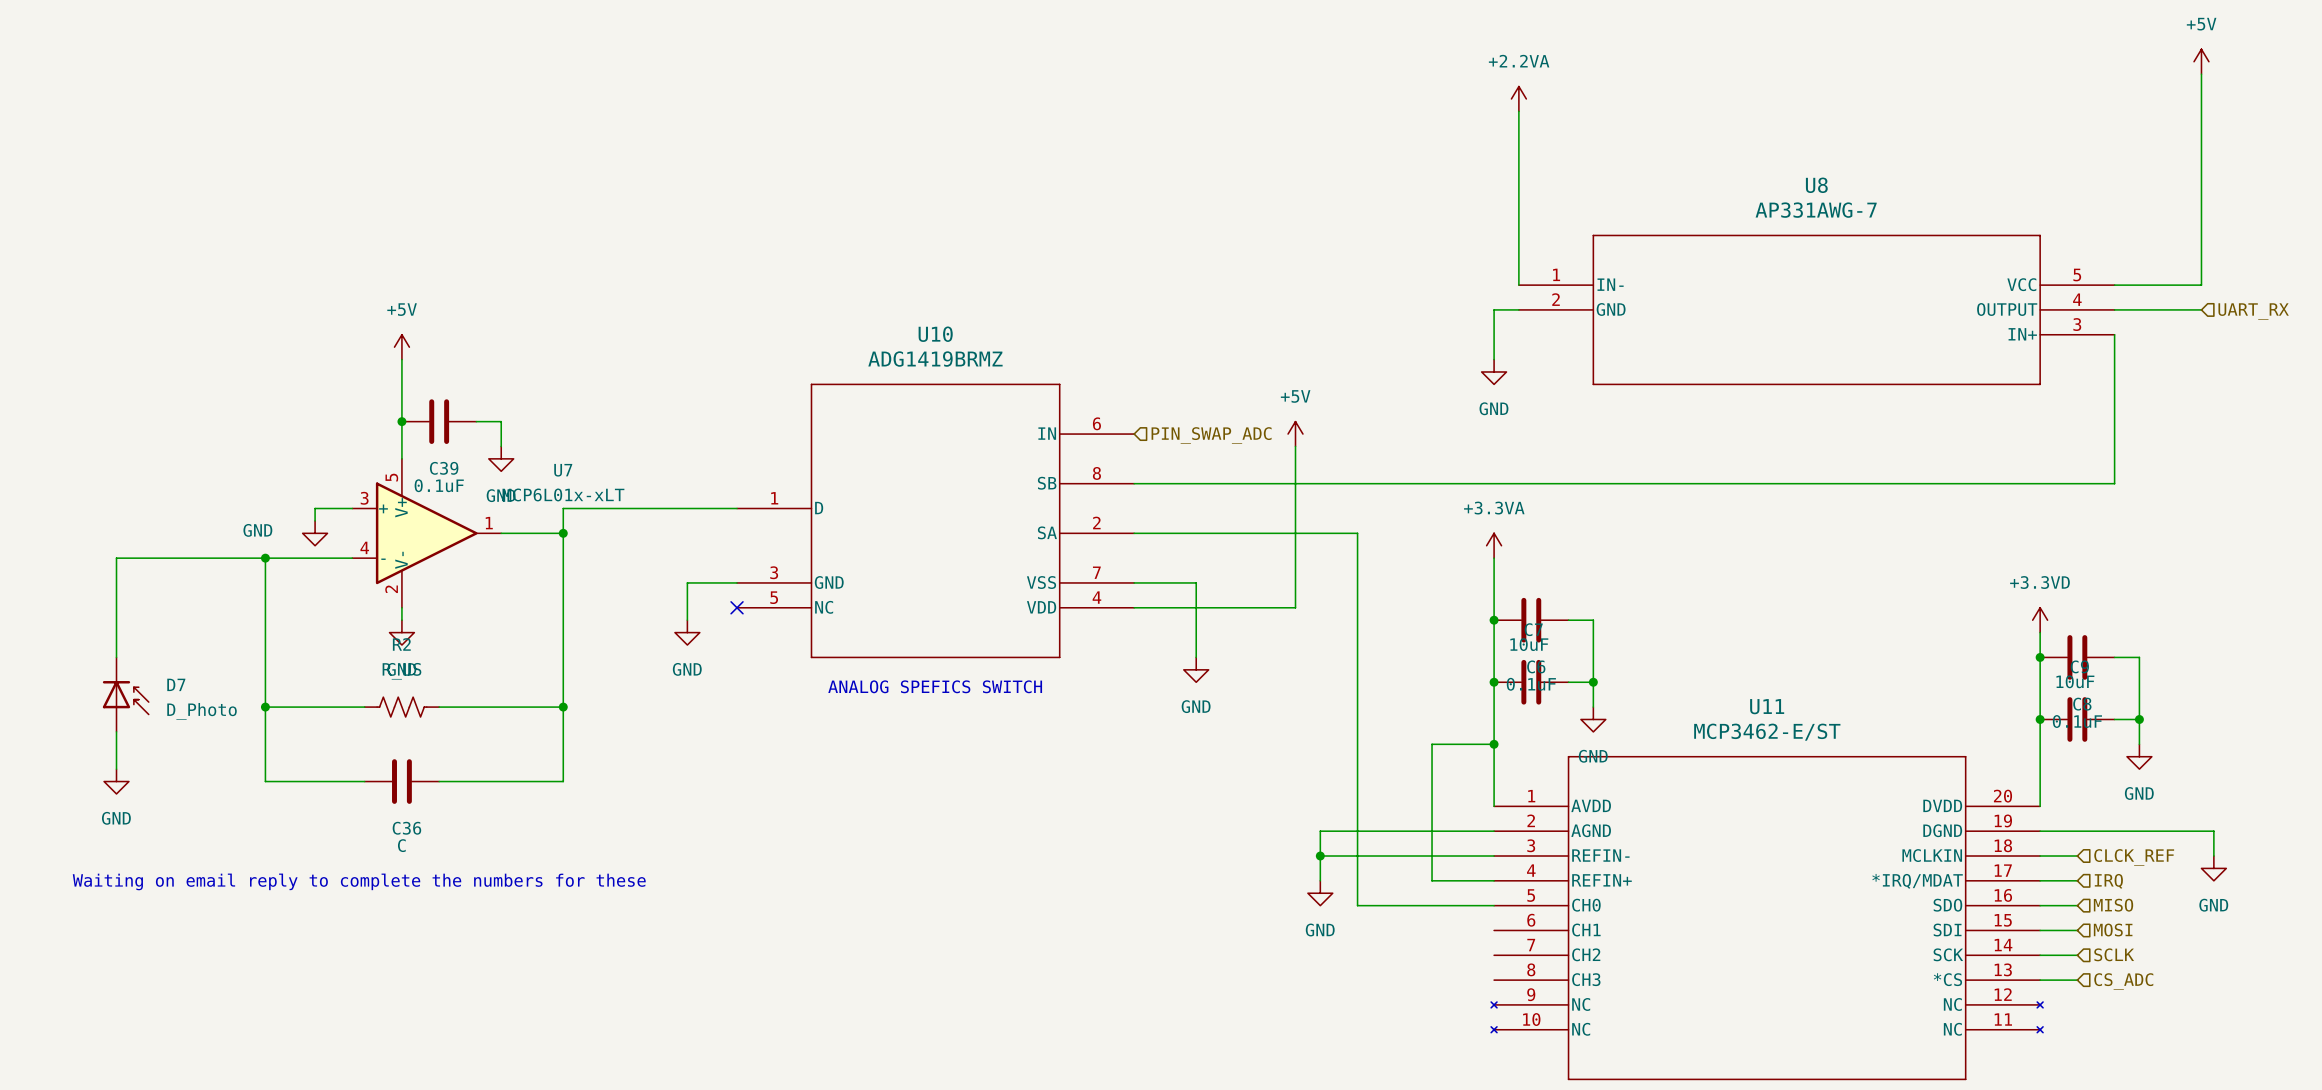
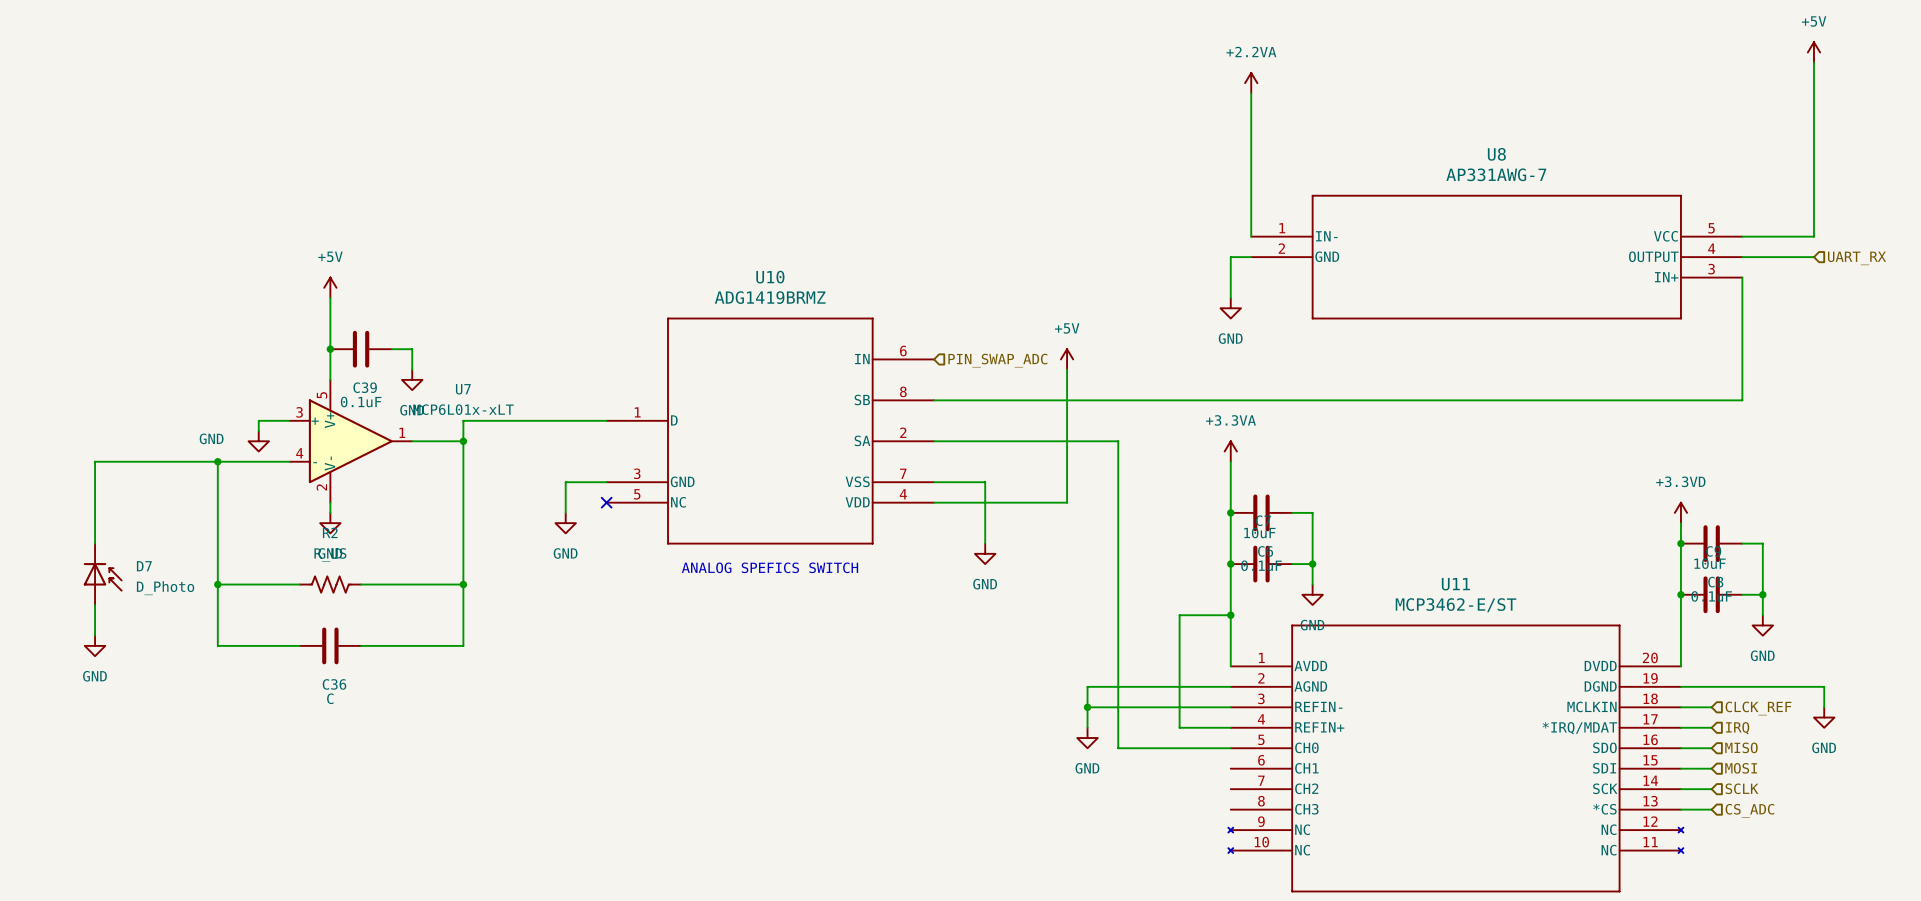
text: Waiting on email reply to complete the numbers for these (359, 881) -> none

